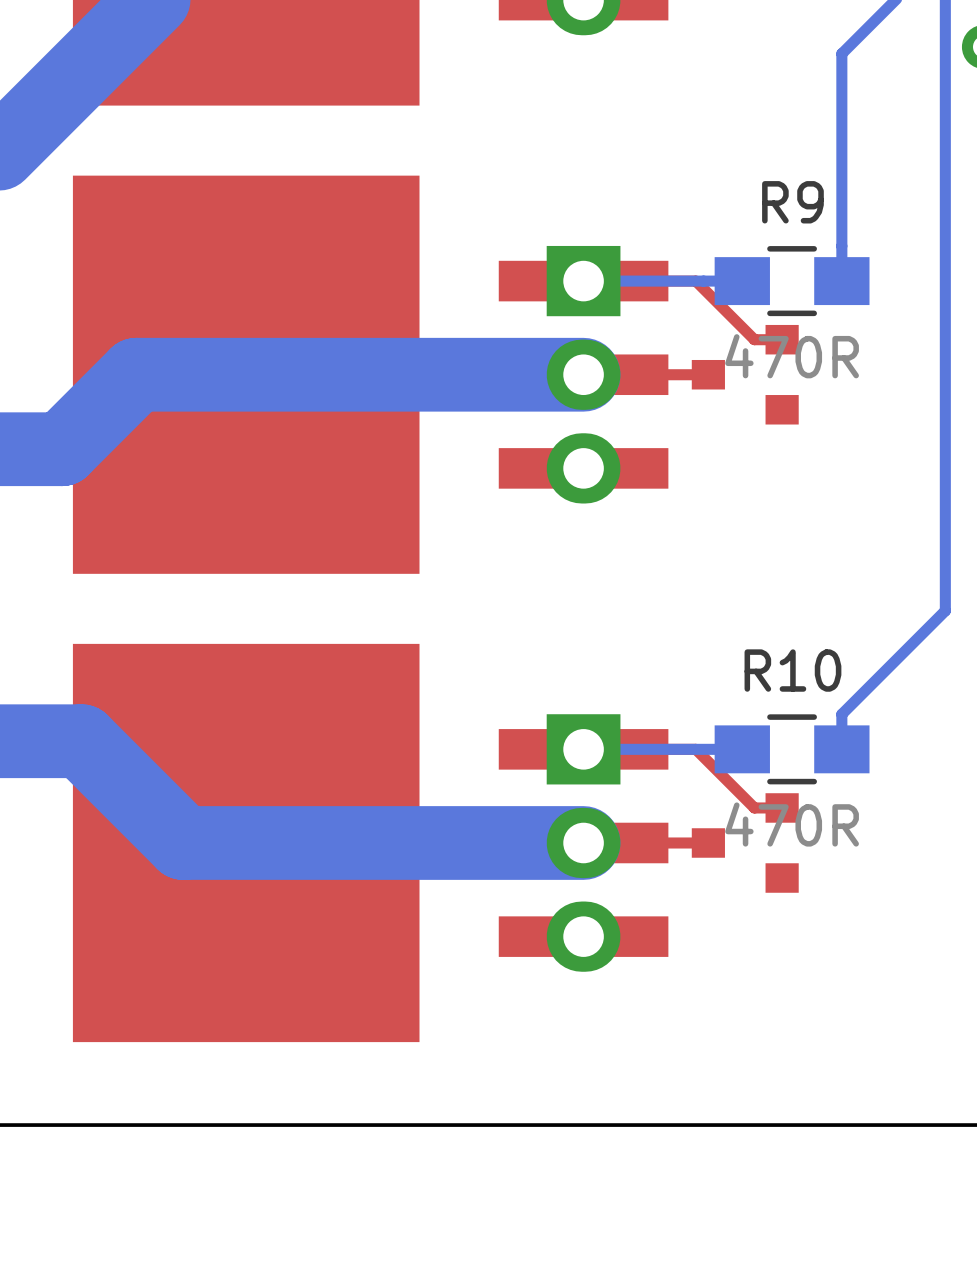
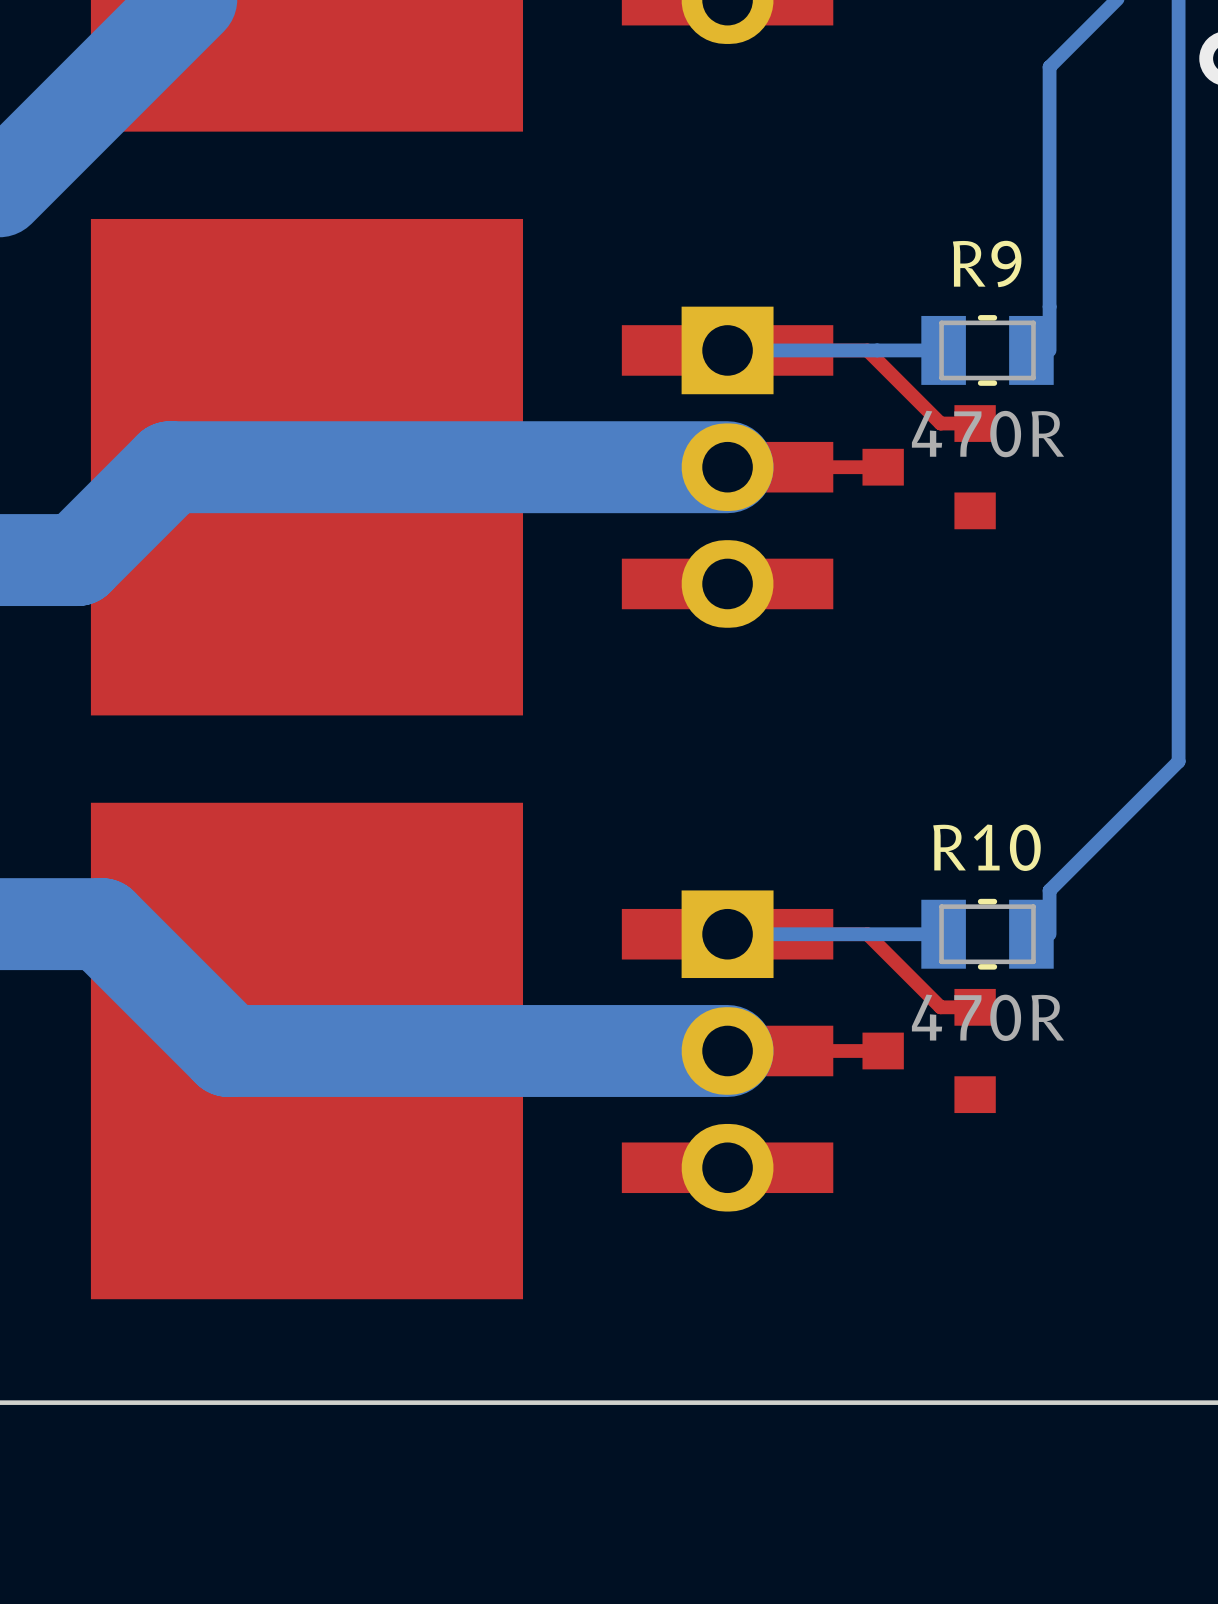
R9 footprint: [714, 246, 870, 317] -> [921, 315, 1054, 386]
R10 footprint: [714, 714, 870, 785] -> [921, 898, 1054, 970]

